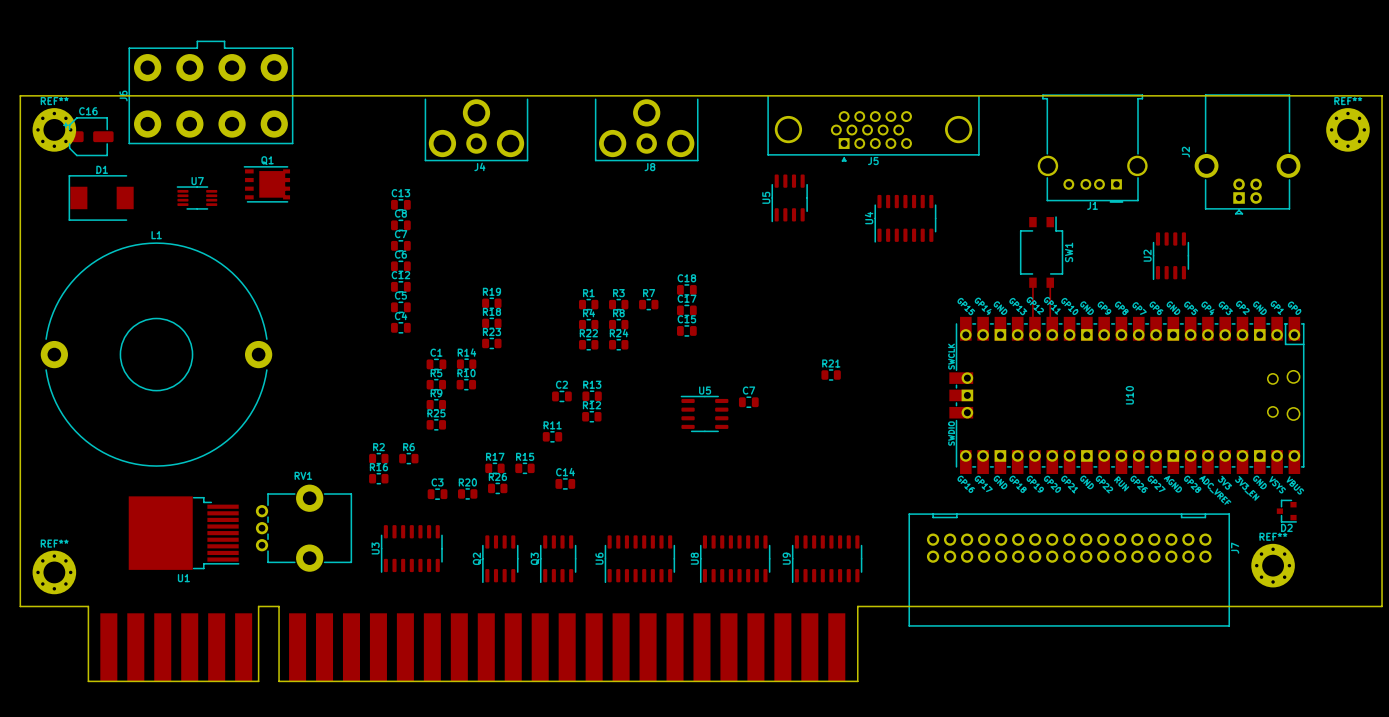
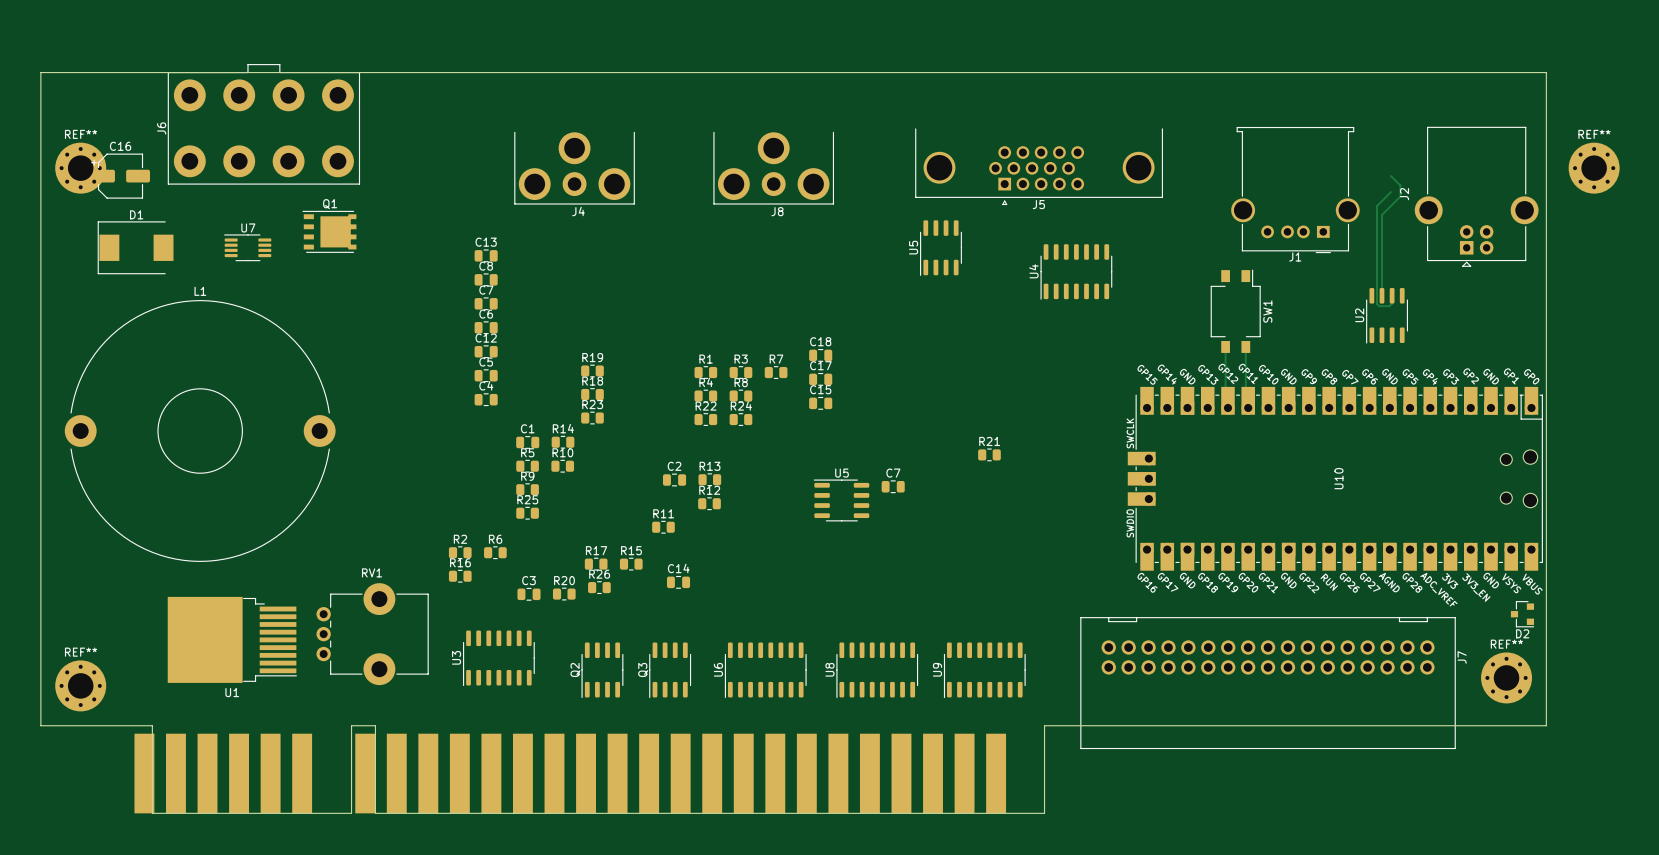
board edge: (20, 95) (1382, 95) (1382, 606) (1307, 606) -> (40, 128) (40, 72) (1546, 72) (1546, 725)
track: none -> (1391, 176) (1400, 185) (1400, 196) (1381, 214) (1381, 295)
track: none -> (1391, 192) (1377, 206) (1377, 303) (1379, 306) (1389, 306) (1392, 303) (1392, 295)
board edge: (88, 606) (88, 681) (115, 681) -> (120, 725) (152, 725) (152, 813)
board edge: (878, 606) (857, 606) (857, 681) -> (1044, 725) (1044, 813) (1020, 813)
board edge: (258, 681) (258, 606) (279, 606) (279, 681) -> (319, 813) (343, 813)
board edge: (285, 681) (306, 681) -> (351, 813) (351, 725) (375, 725) (375, 813)

